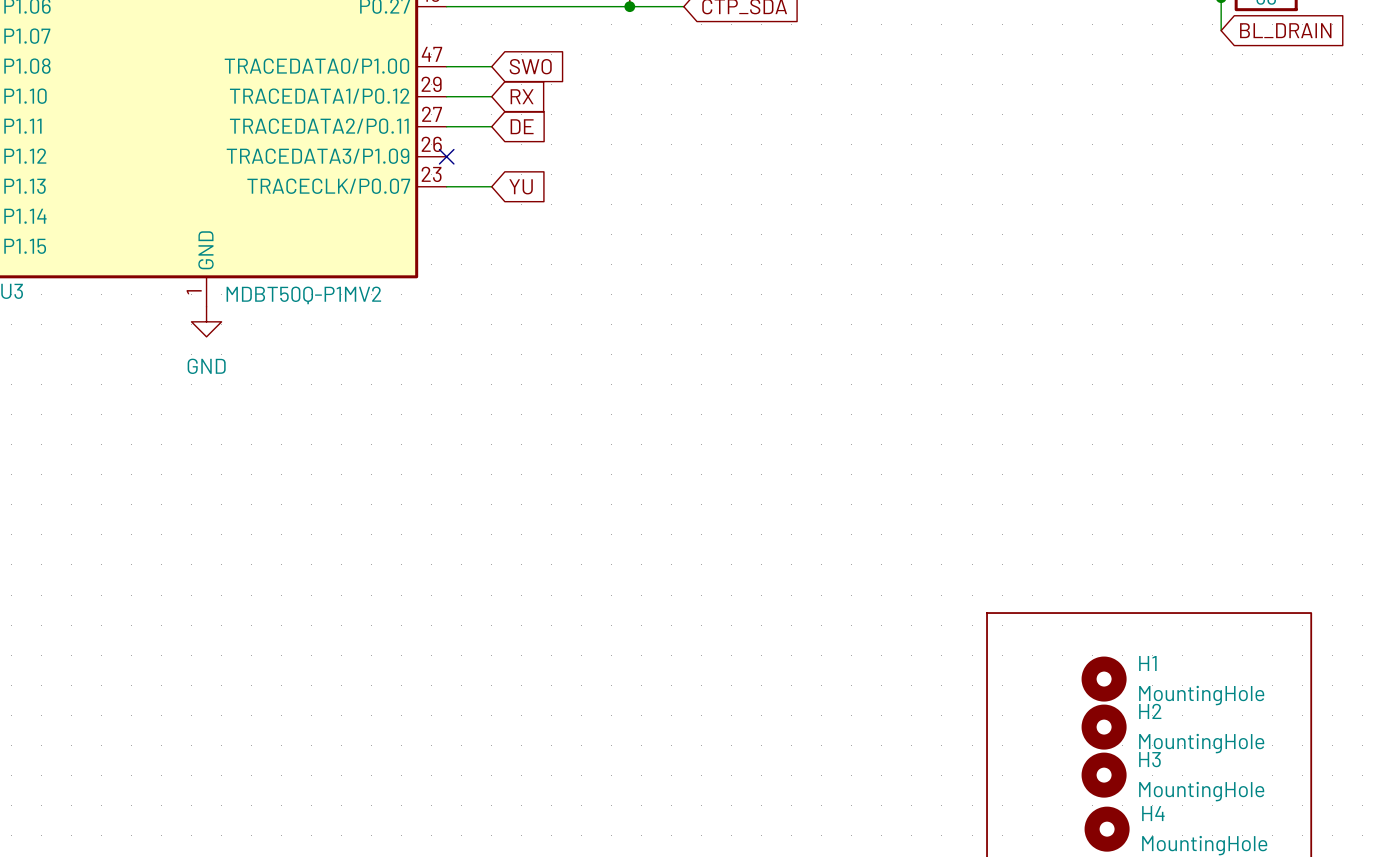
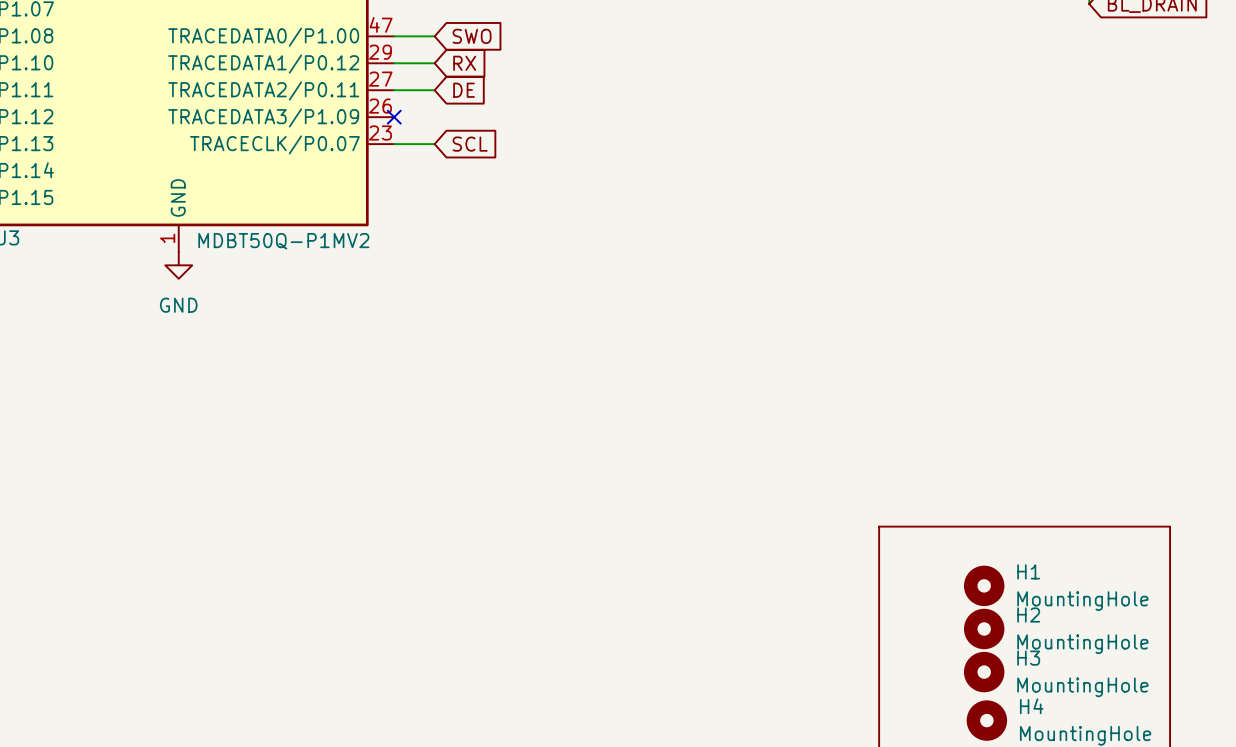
global label: YU (521, 186) -> SCL (470, 144)

